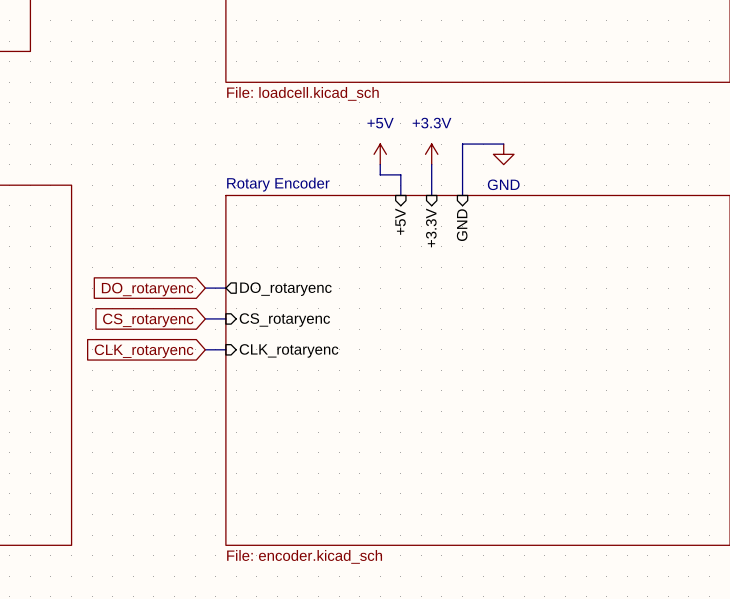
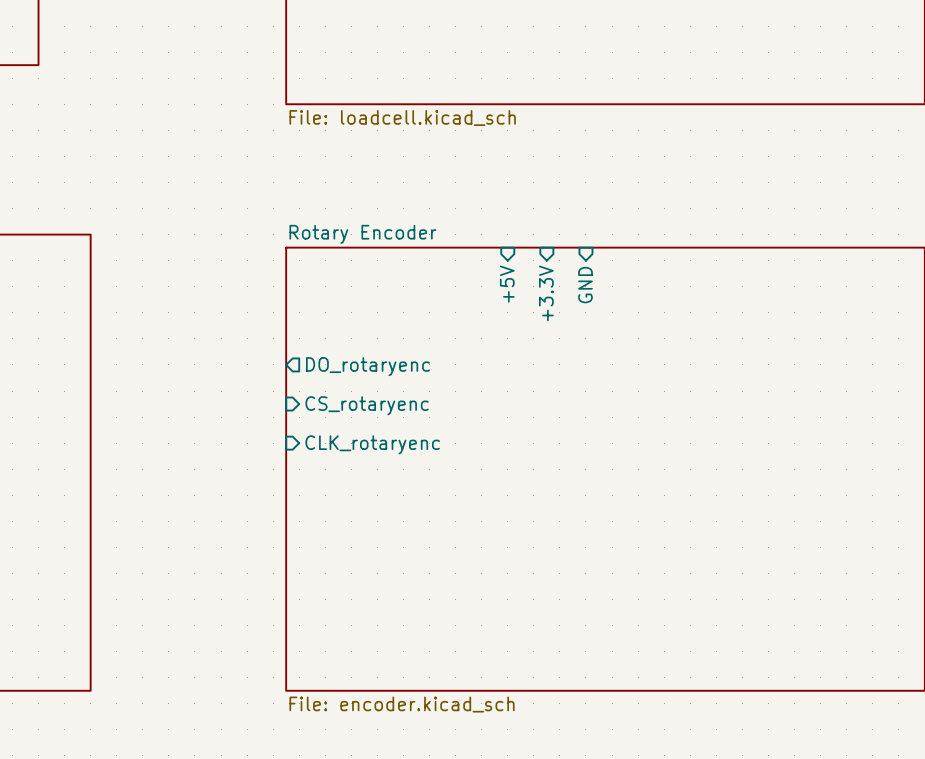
wire: (503, 144) (462, 144) (462, 195) -> none
power symbol: +5V (380, 154) -> none
power symbol: +3.3V (431, 154) -> none
power symbol: GND (503, 154) -> none
wire: (380, 164) (380, 174) (400, 174) (400, 195) -> none
wire: (431, 164) (431, 195) -> none
wire: (205, 288) (225, 288) -> none
global label: DO_rotaryenc (147, 289) -> none
wire: (205, 318) (225, 318) -> none
global label: CS_rotaryenc (148, 320) -> none
wire: (205, 349) (225, 349) -> none
global label: CLK_rotaryenc (144, 351) -> none

